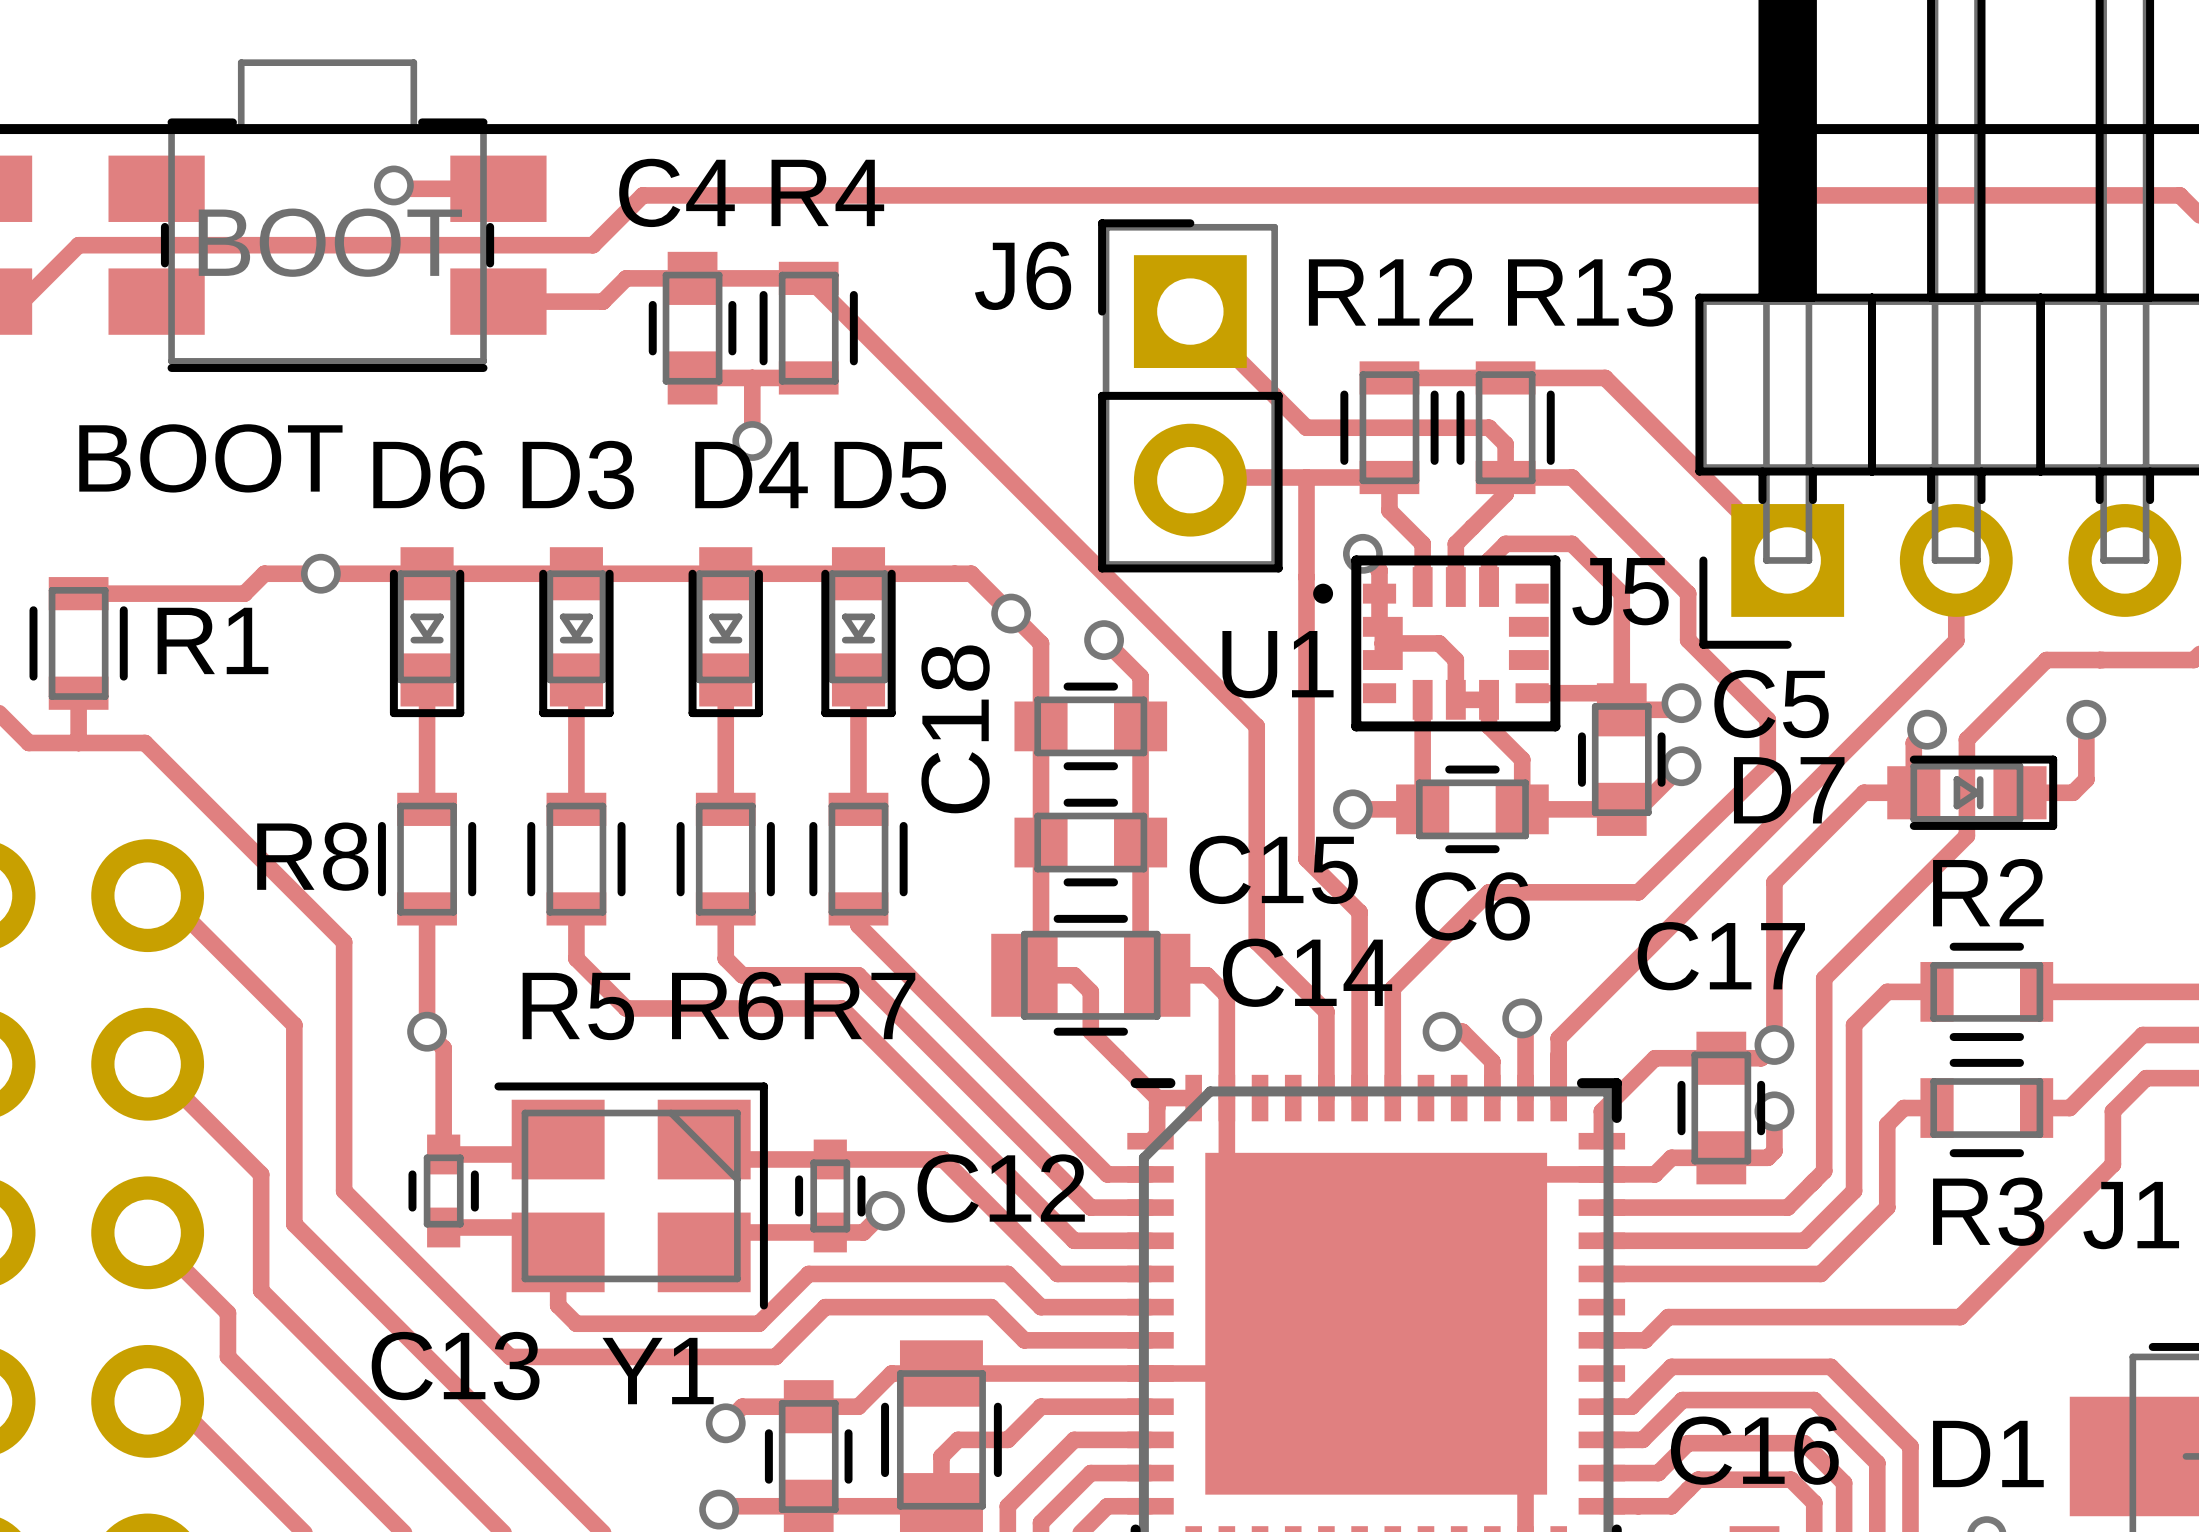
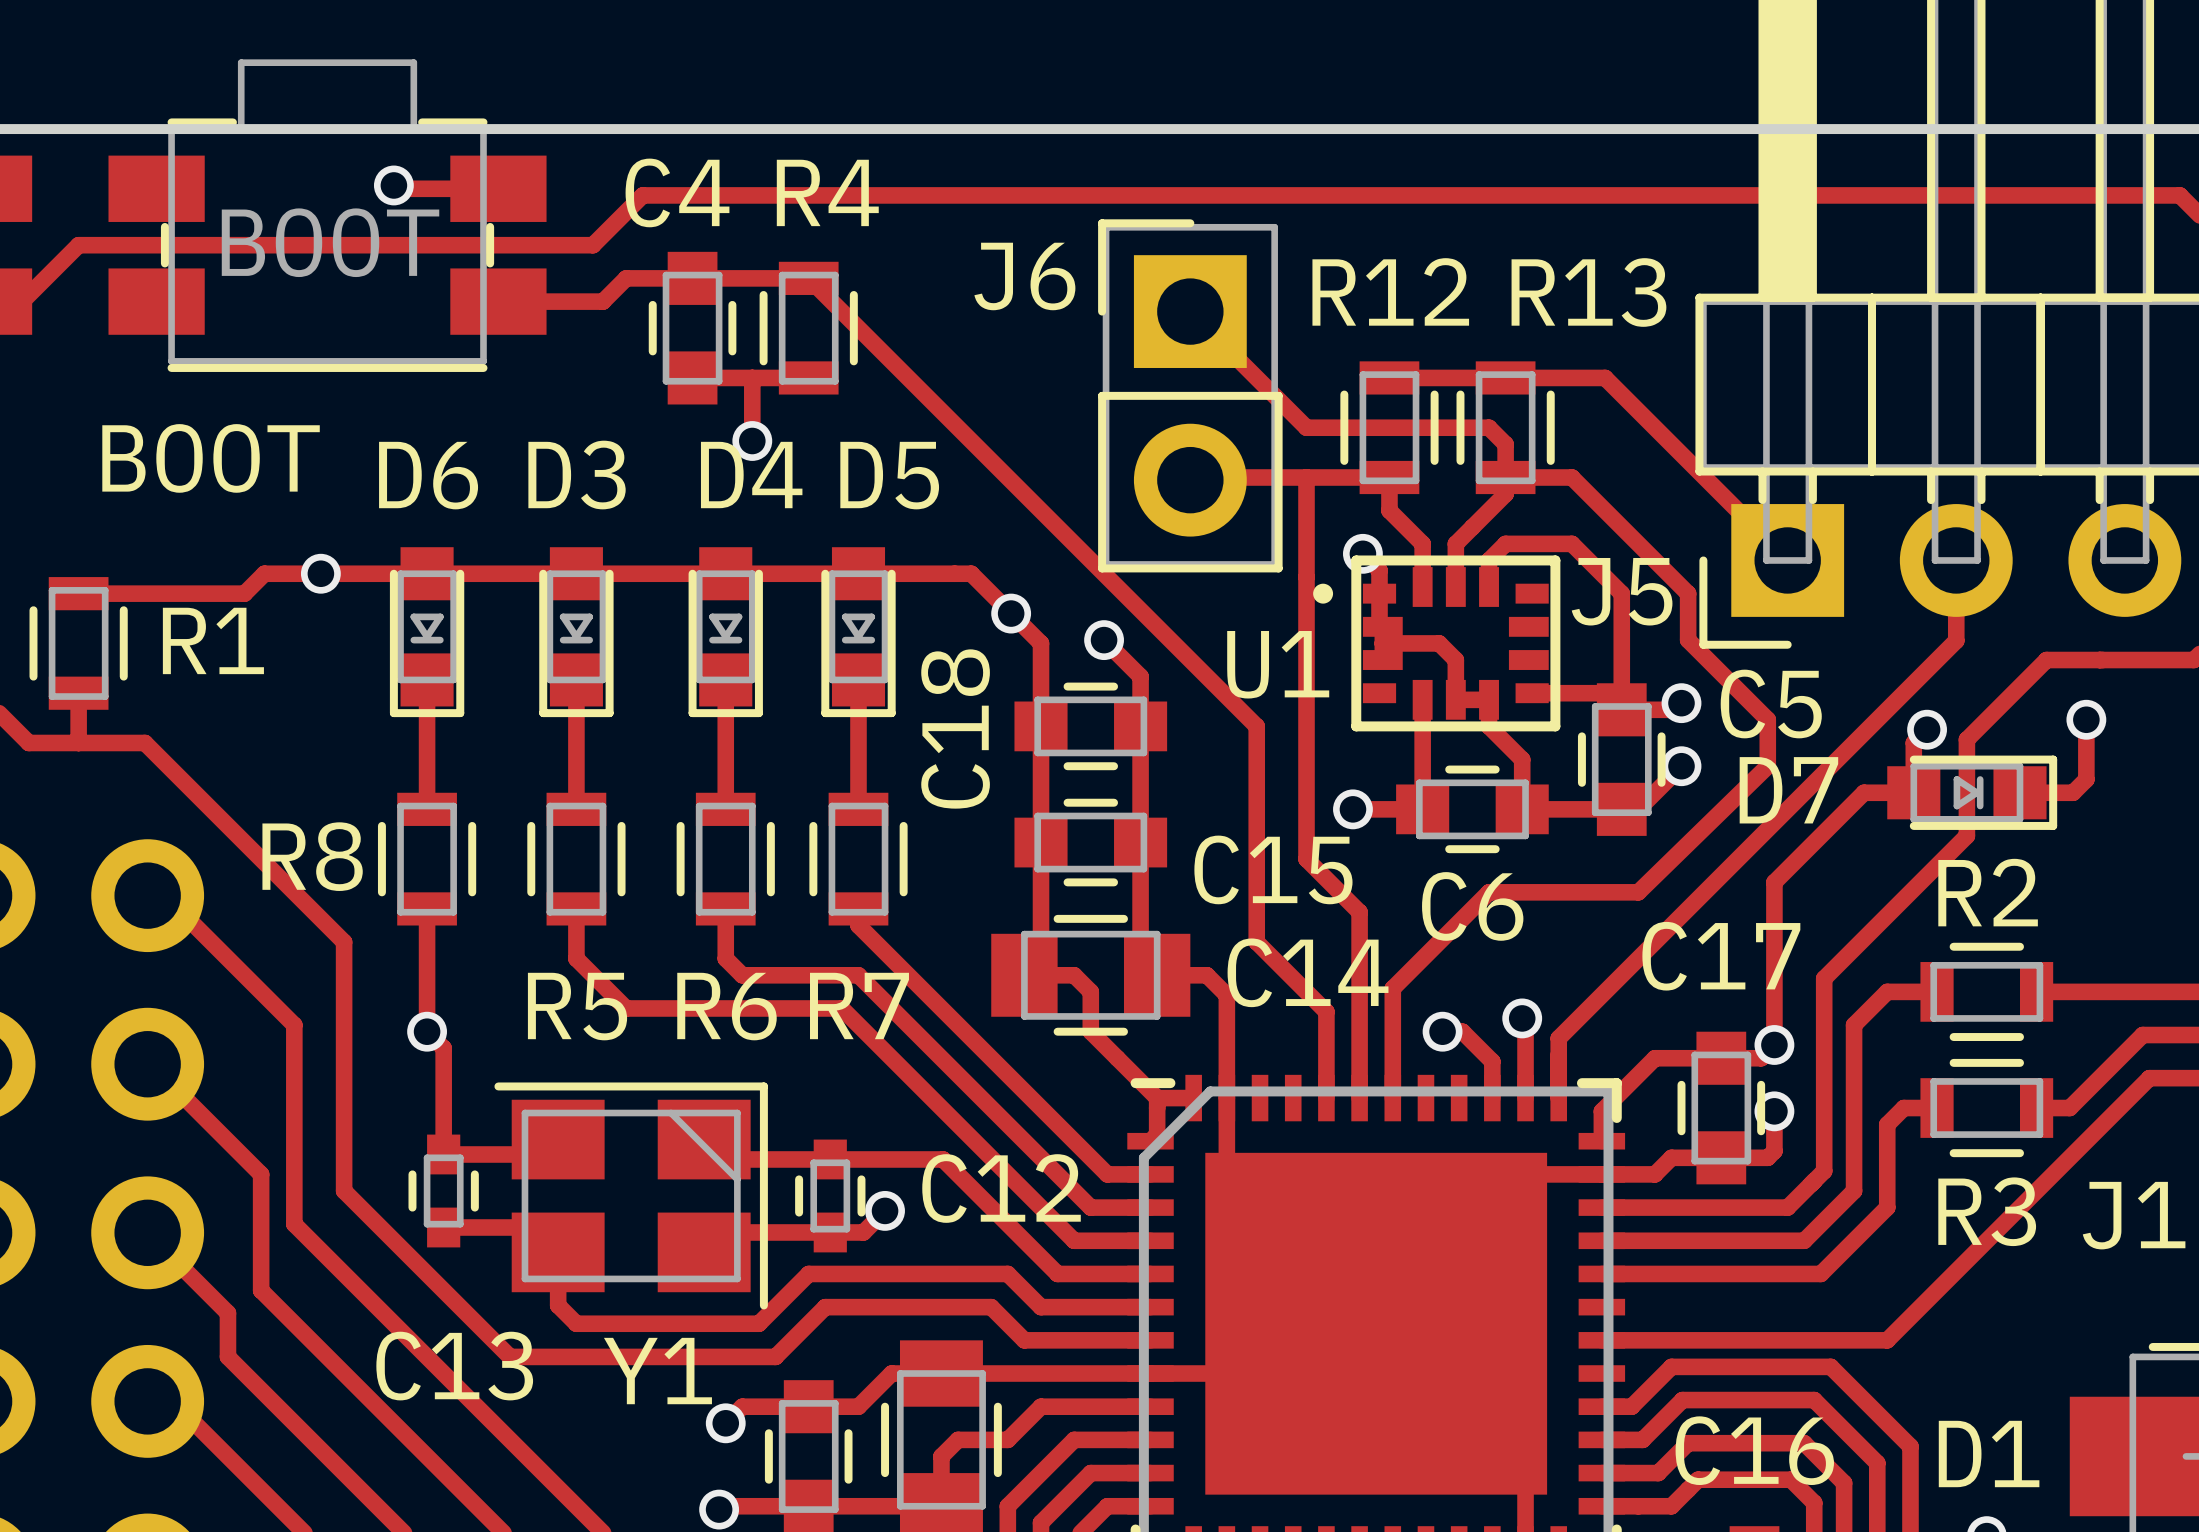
track: (2149, 1078) (2146, 1078) (2112, 1111) (2112, 1164) (1960, 1317) (1668, 1317) (1644, 1340) -> (2149, 1078) (1887, 1340) (1644, 1340)

